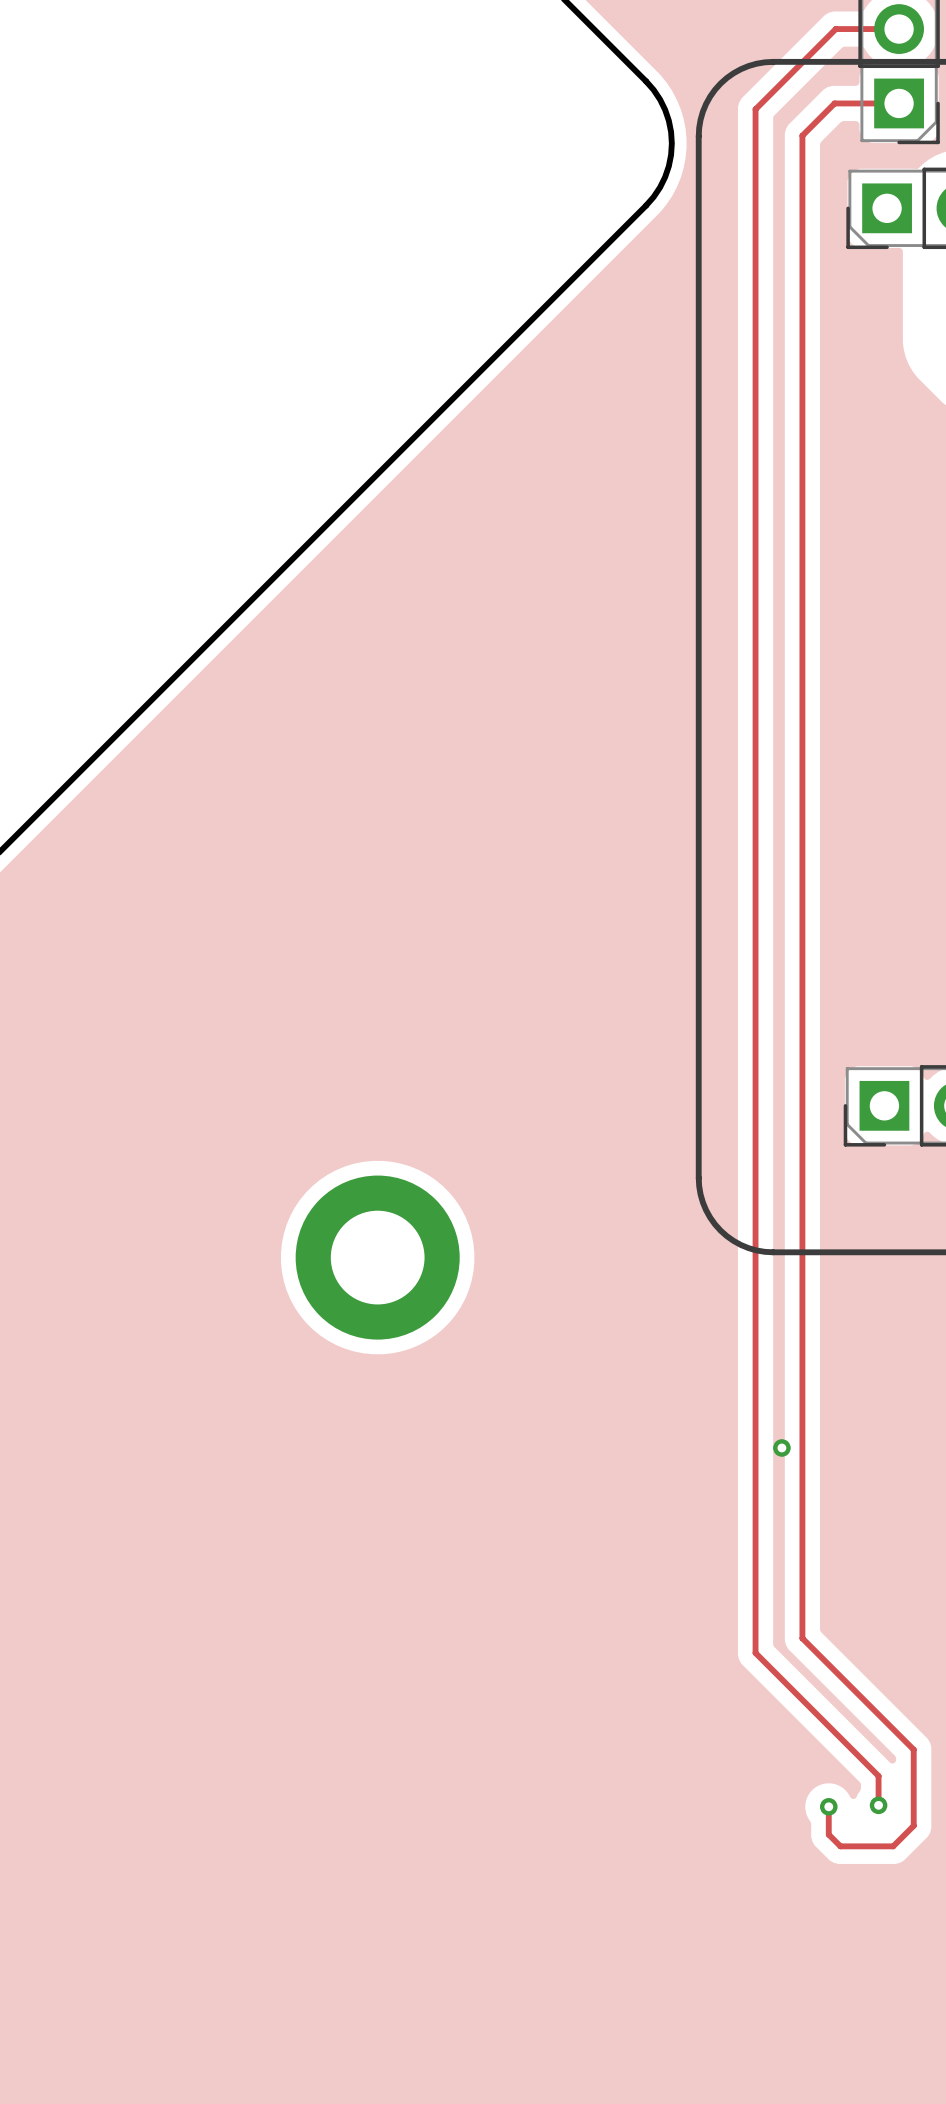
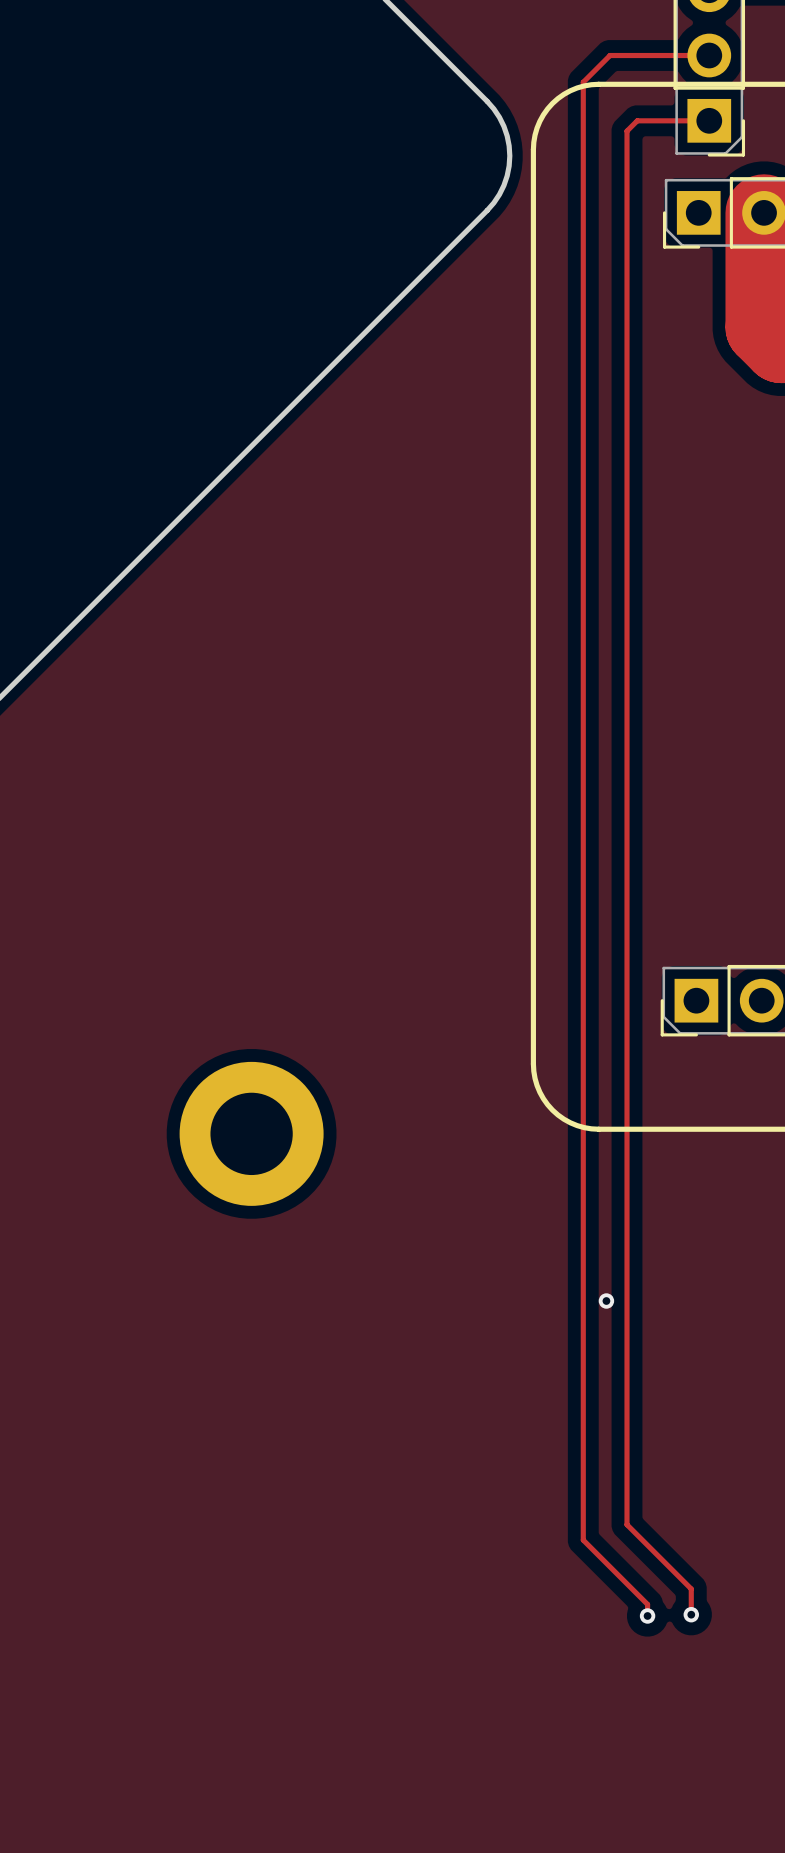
track: (835, 29) (755, 109) -> (653, 55) (610, 55) (583, 82) (583, 125)
track: (834, 103) (802, 135) (802, 1638) (913, 1749) (913, 1825) (893, 1846) (840, 1846) (828, 1834) (828, 1806) -> (652, 120) (637, 120) (627, 131) (627, 1524)
track: (755, 1653) (805, 1702) -> (583, 1480) (583, 1540) (647, 1604) (647, 1615)

